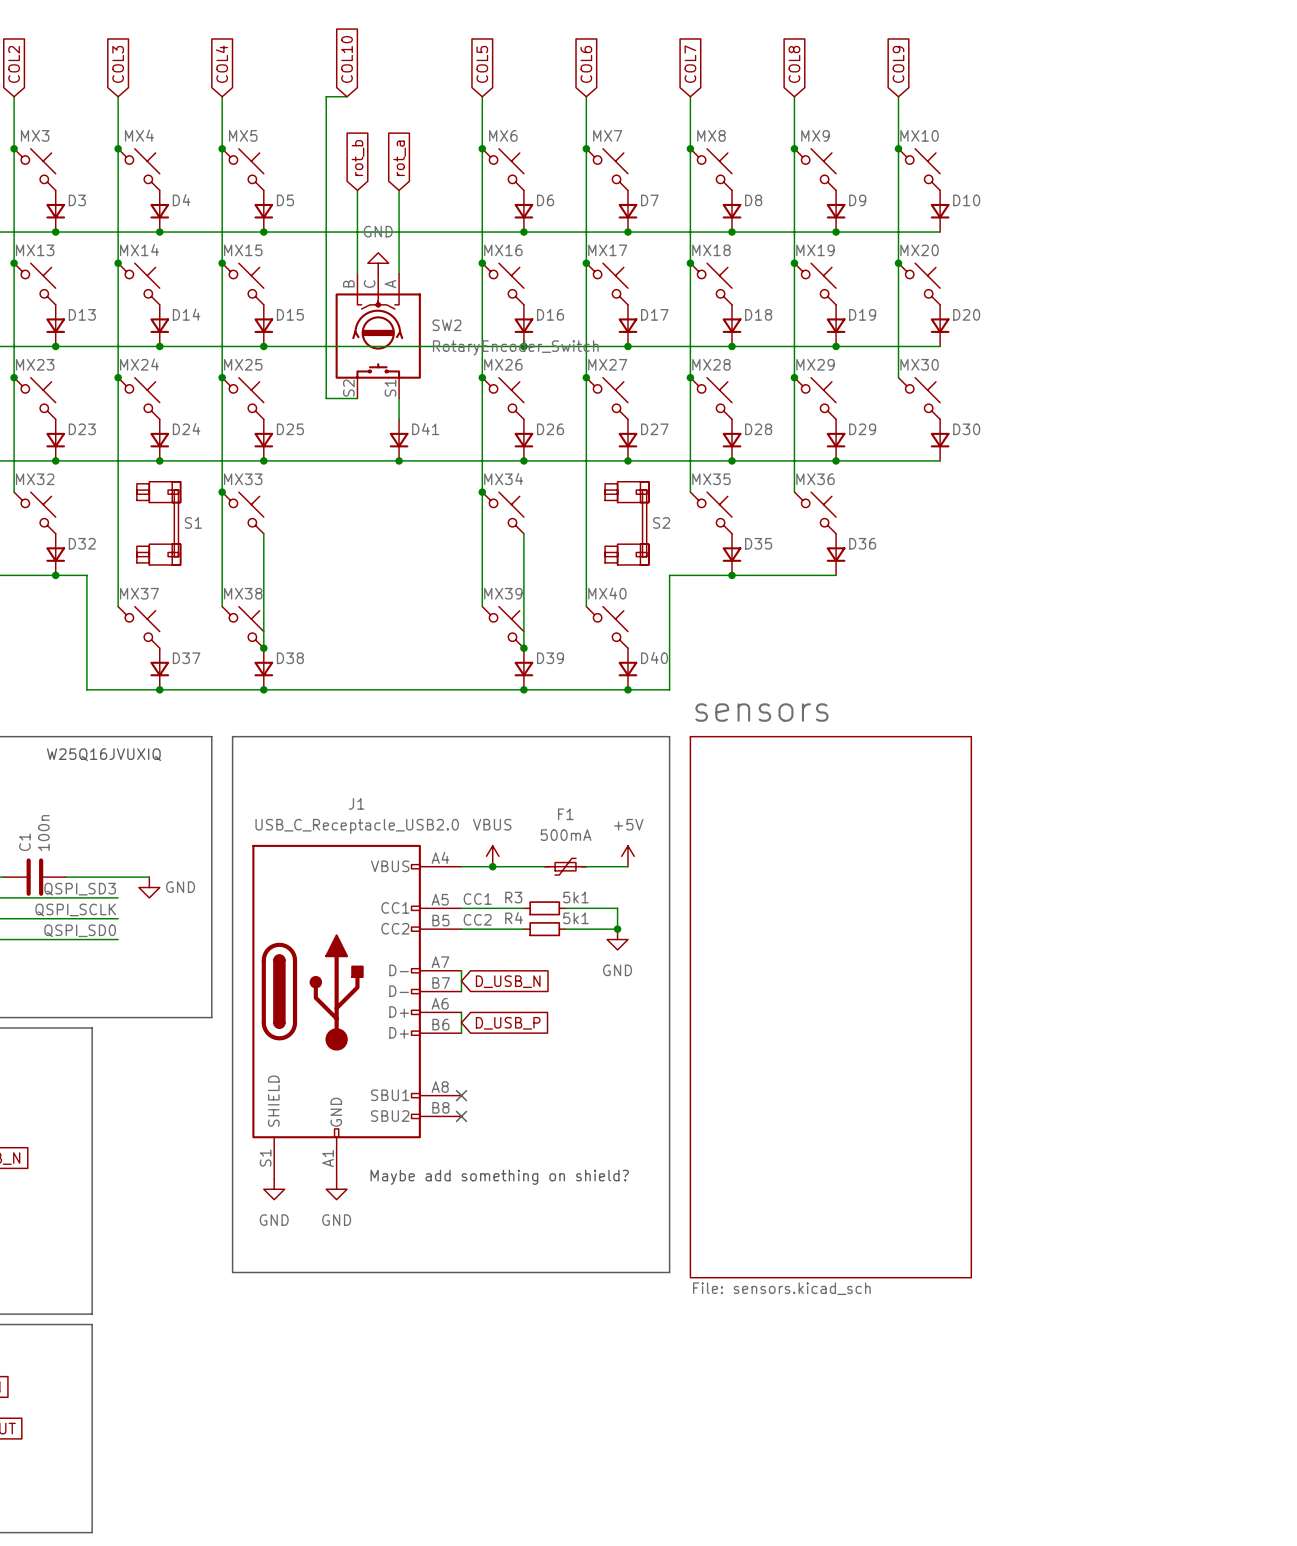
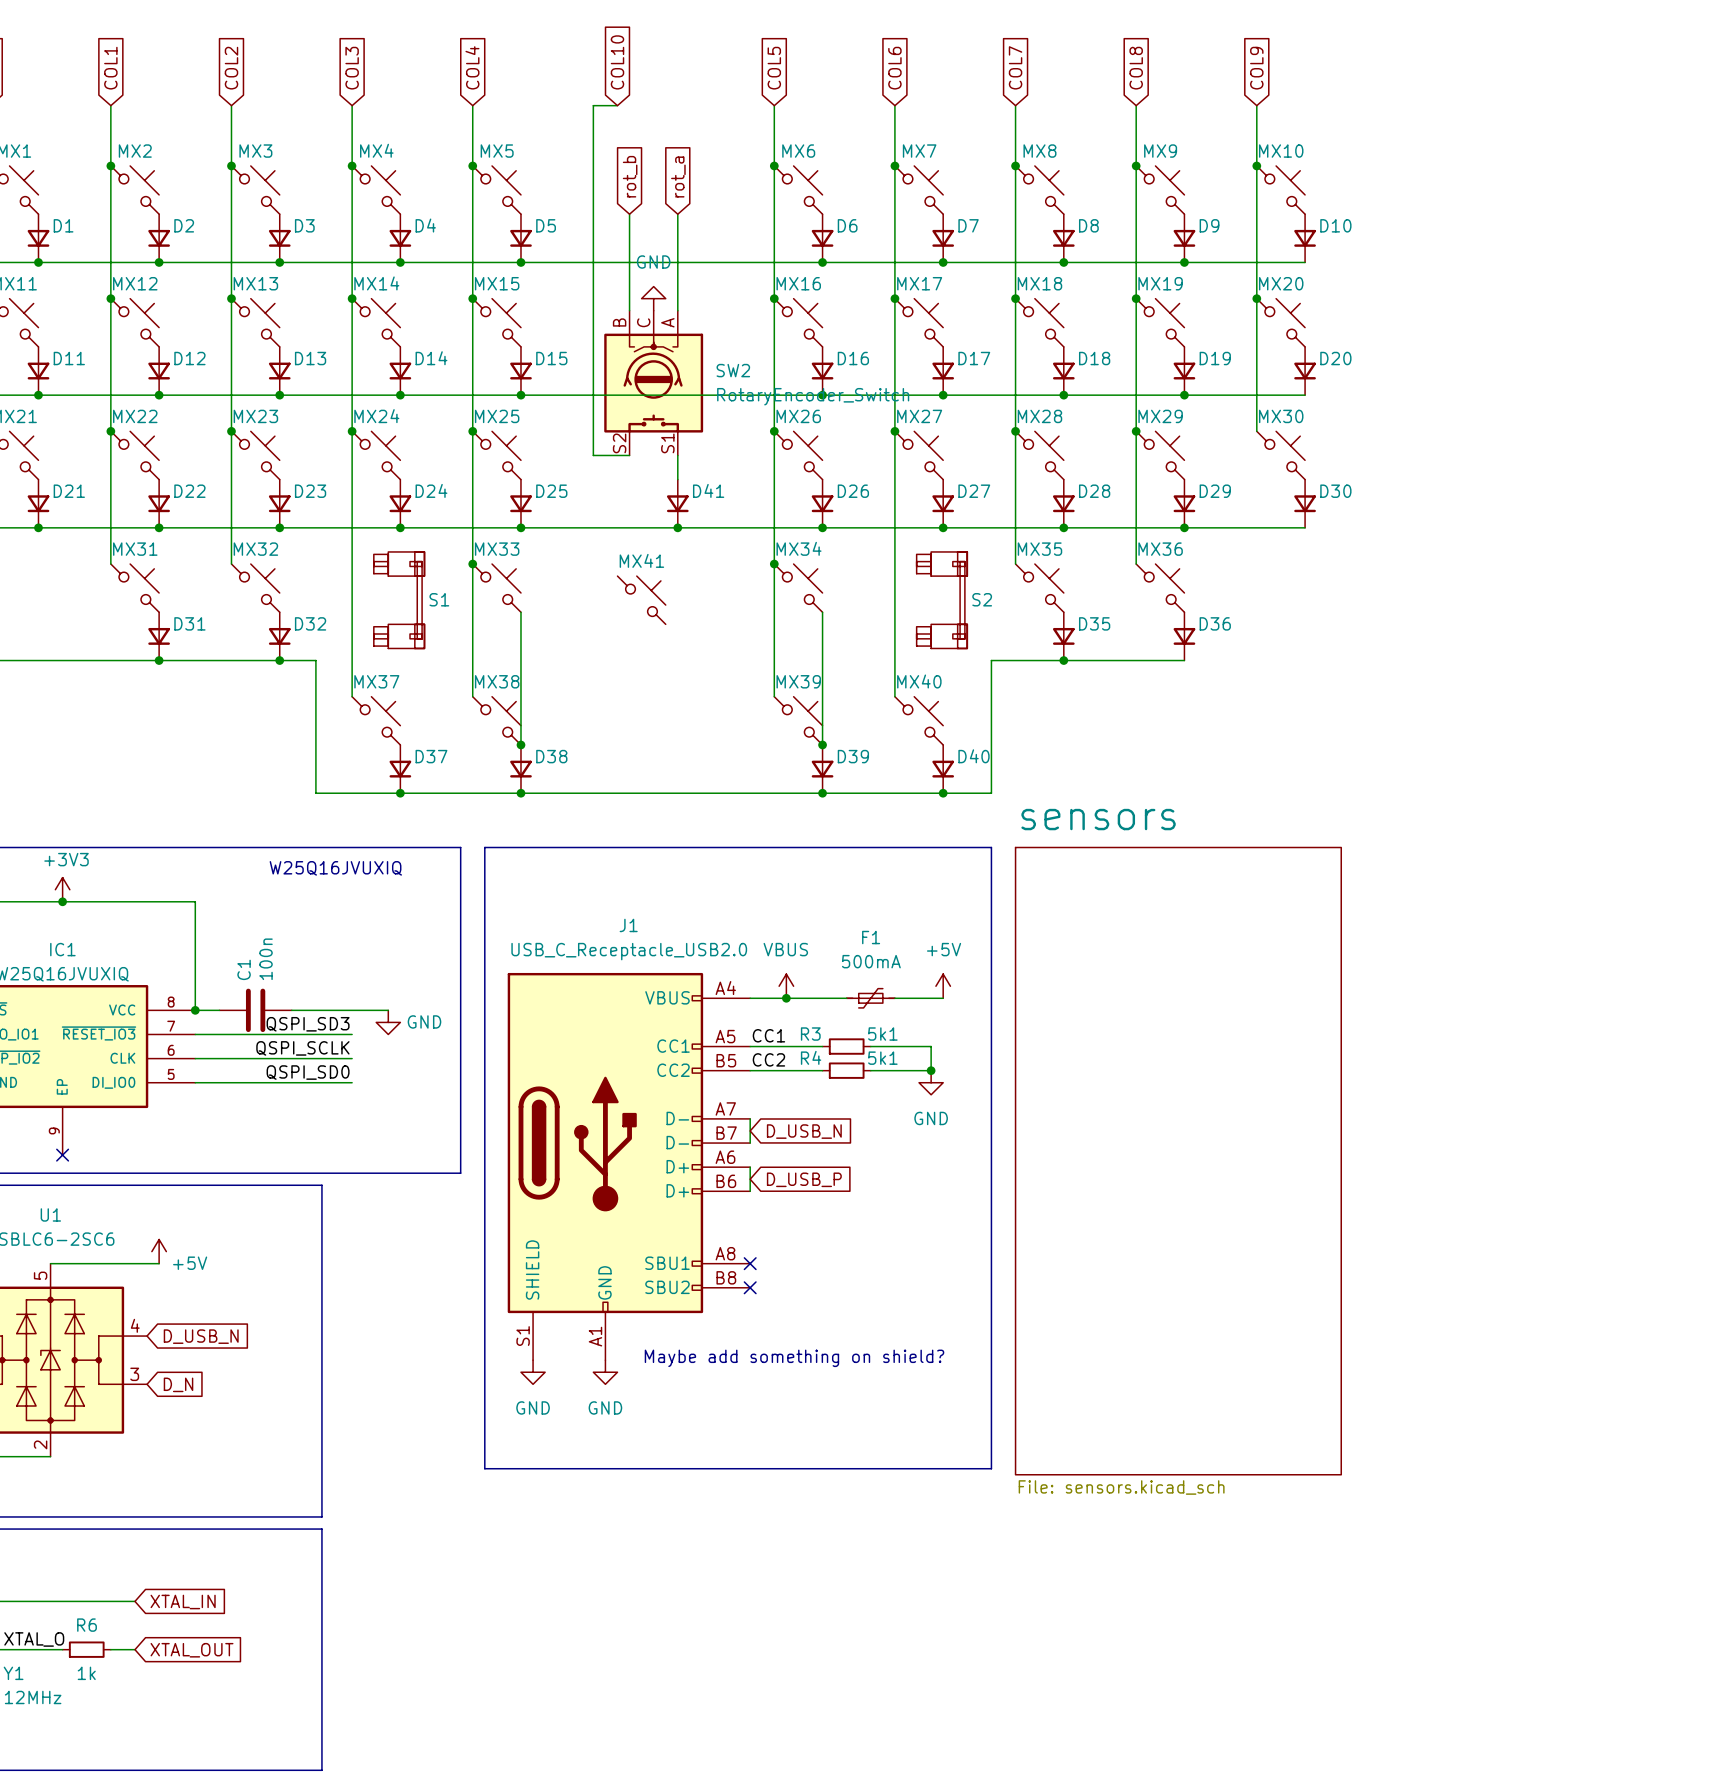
MX41: none -> (641, 600)

